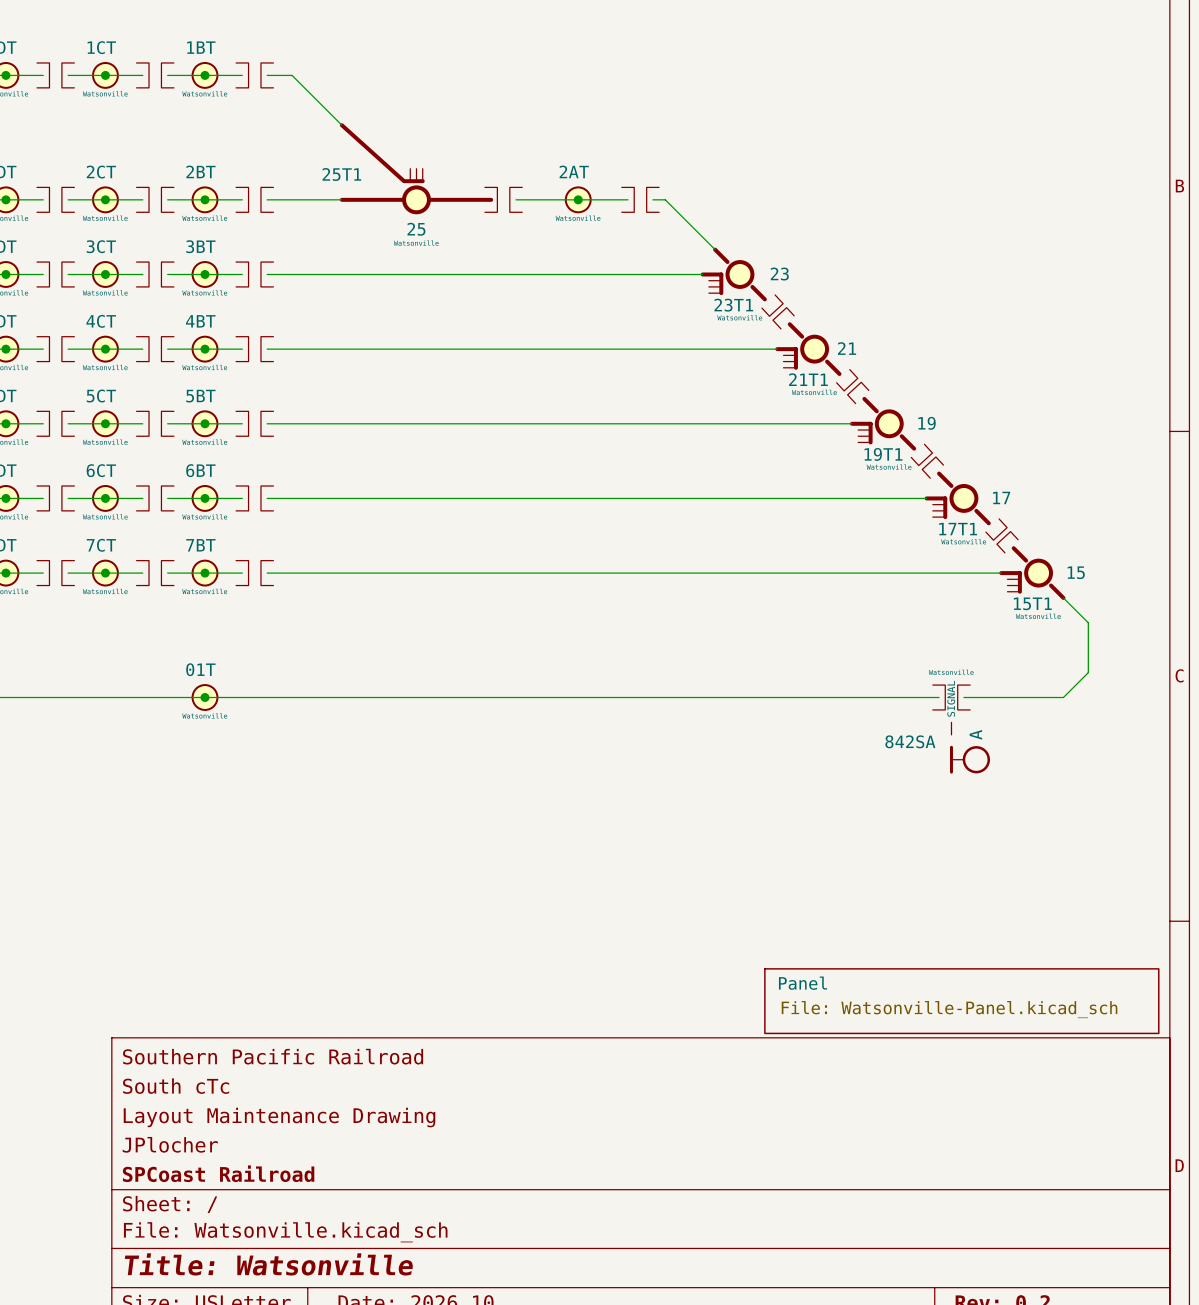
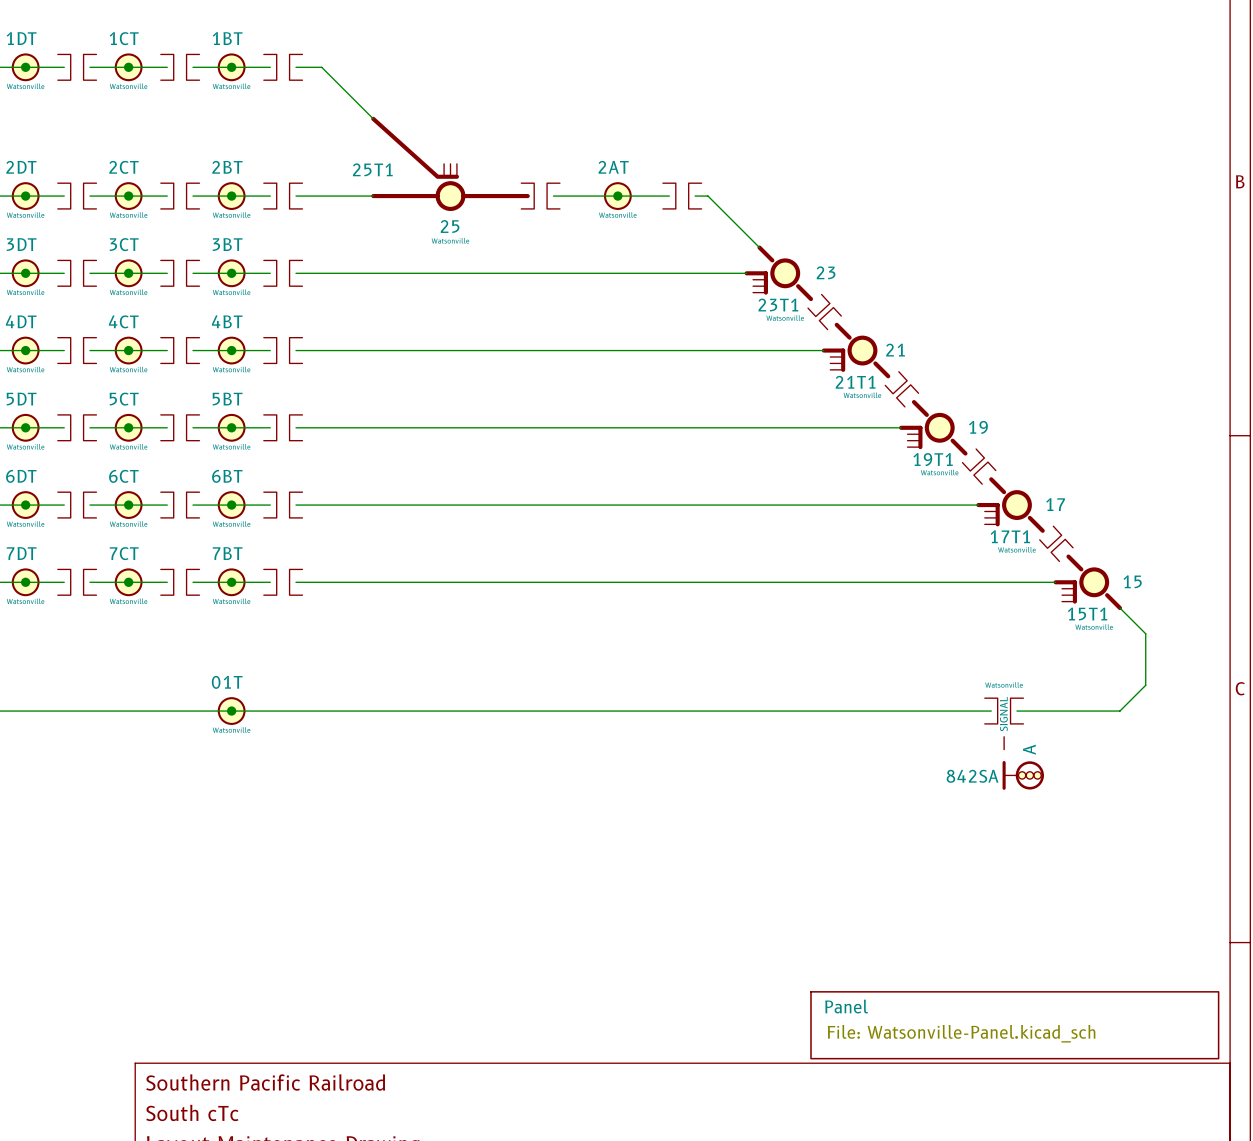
part value position: 842SA (910, 741) -> 842SA (972, 776)
part symbol: [962, 746, 991, 774] -> [1015, 761, 1044, 790]

